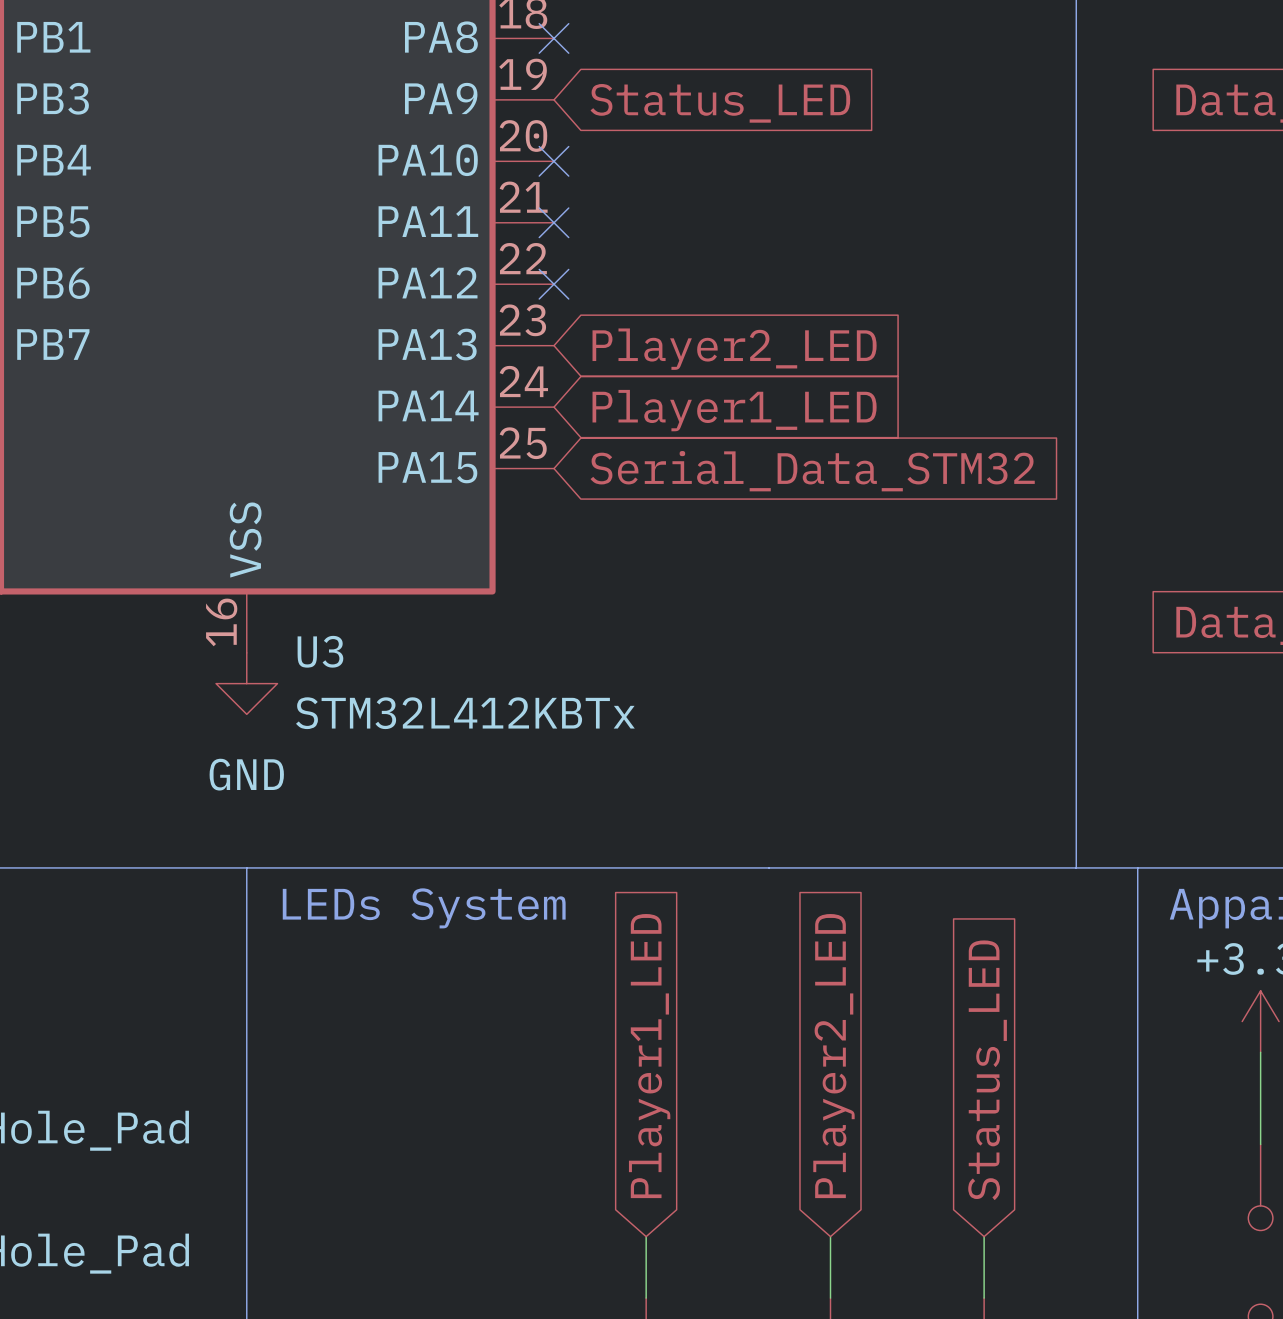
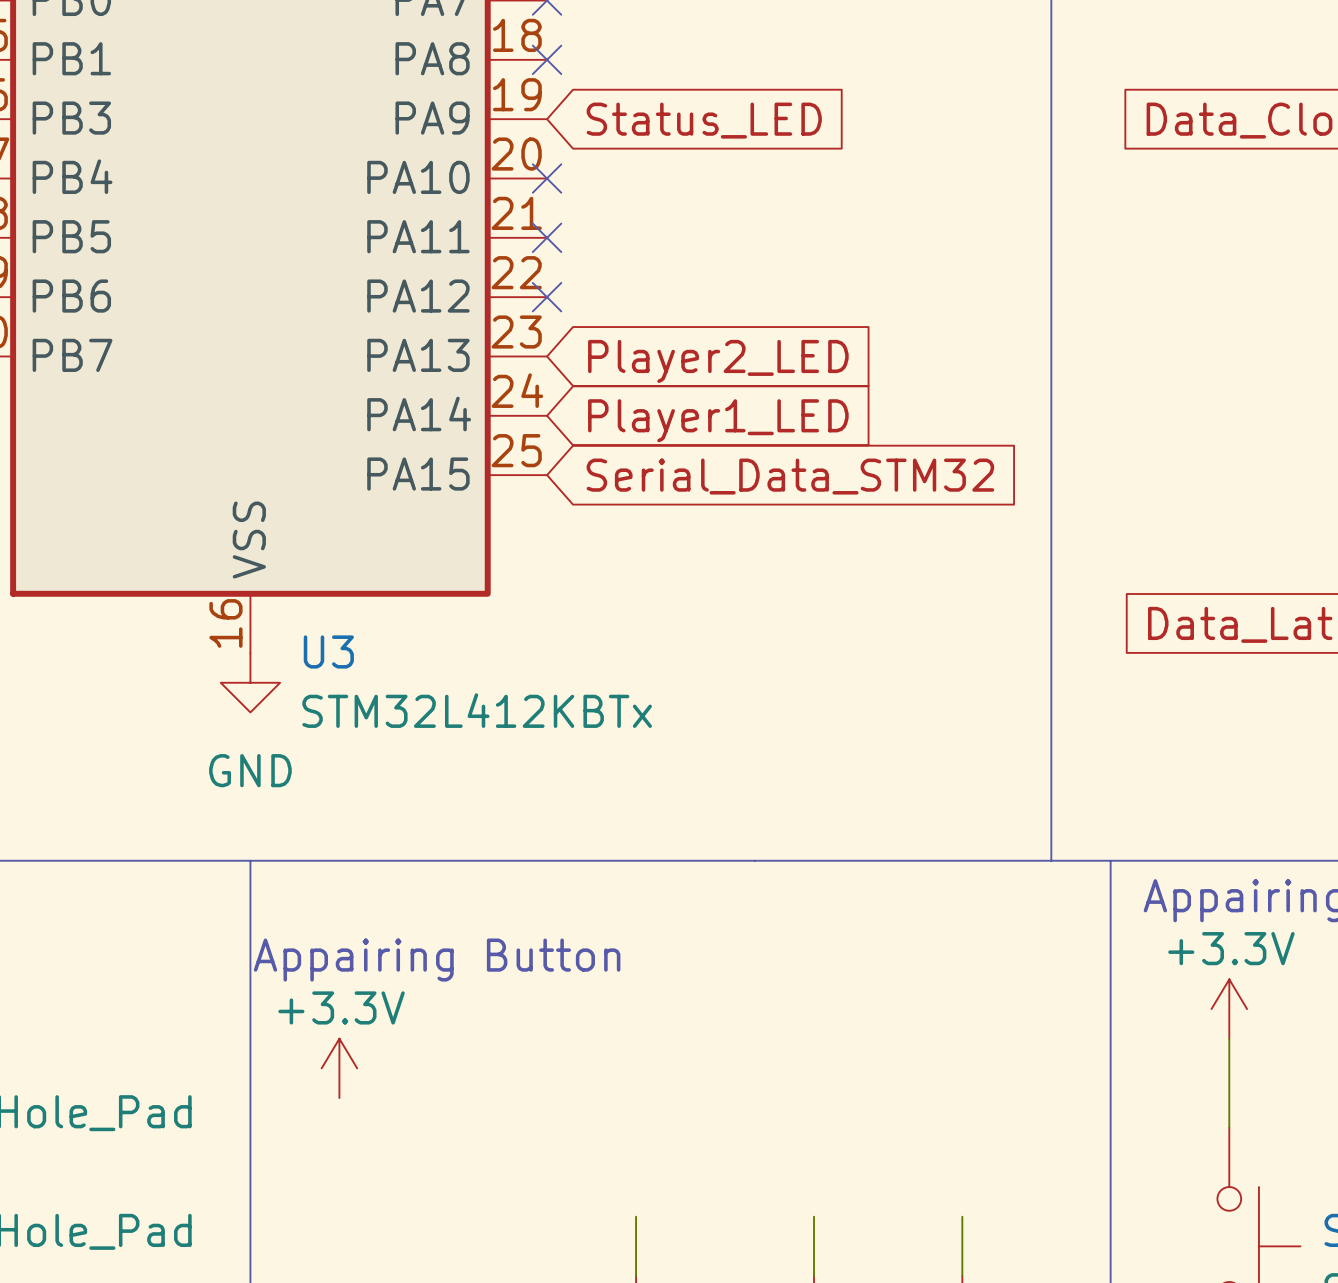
text: LEDs System (424, 908) -> none
text: none -> Appairing Button (437, 960)
global label: Player1_LED (649, 1056) -> none
global label: Player2_LED (833, 1056) -> none
global label: Status_LED (987, 1070) -> none
power symbol: none -> +3.3V (339, 1068)

